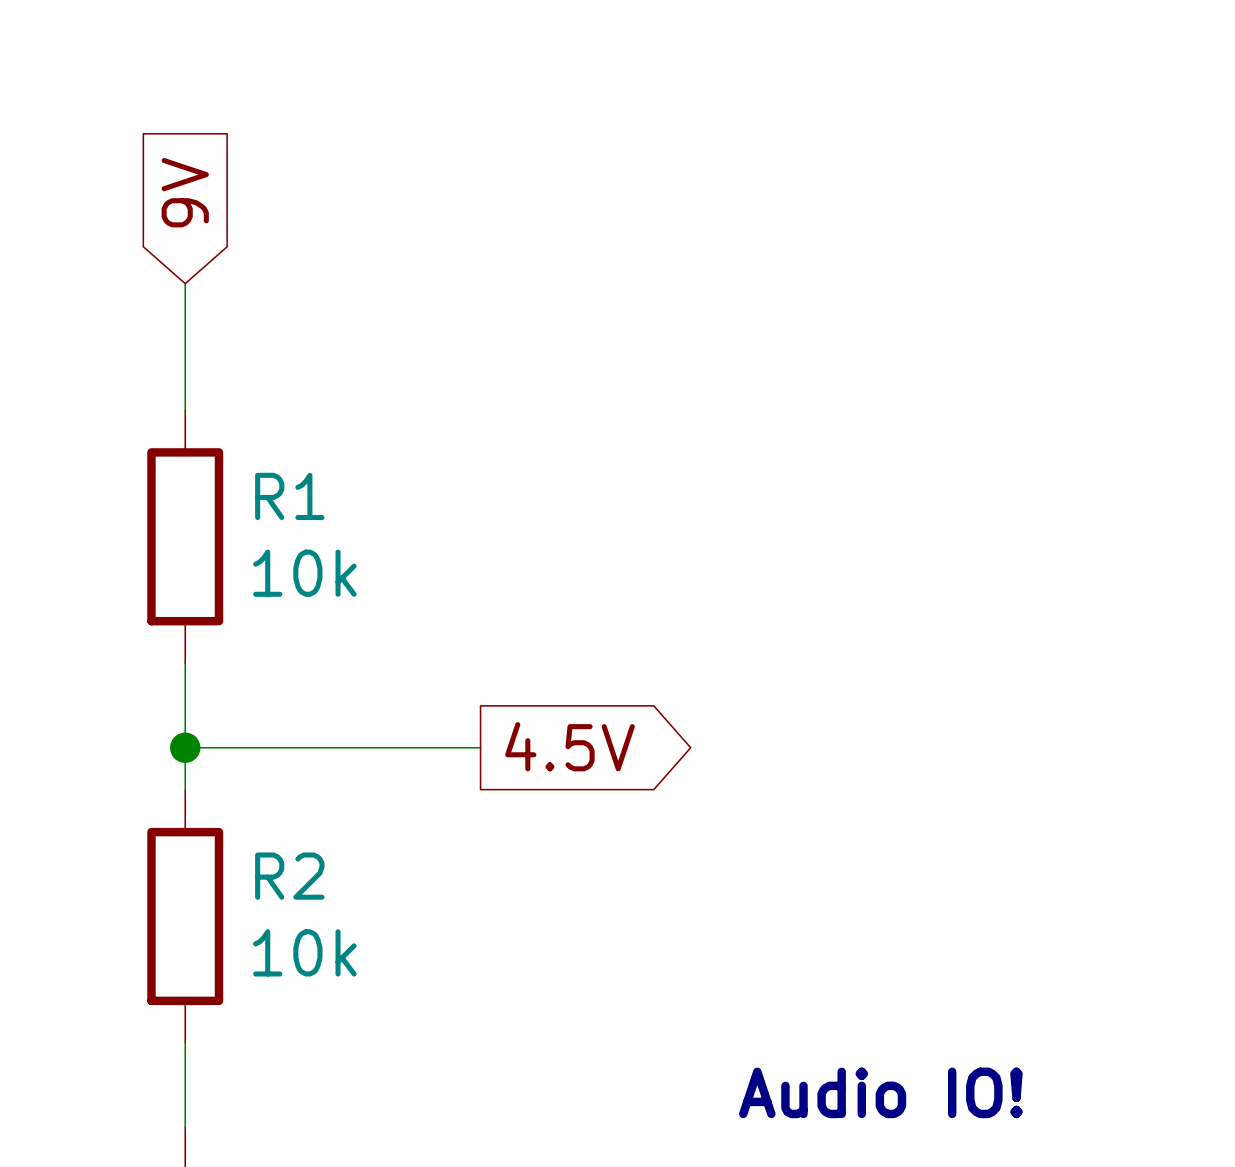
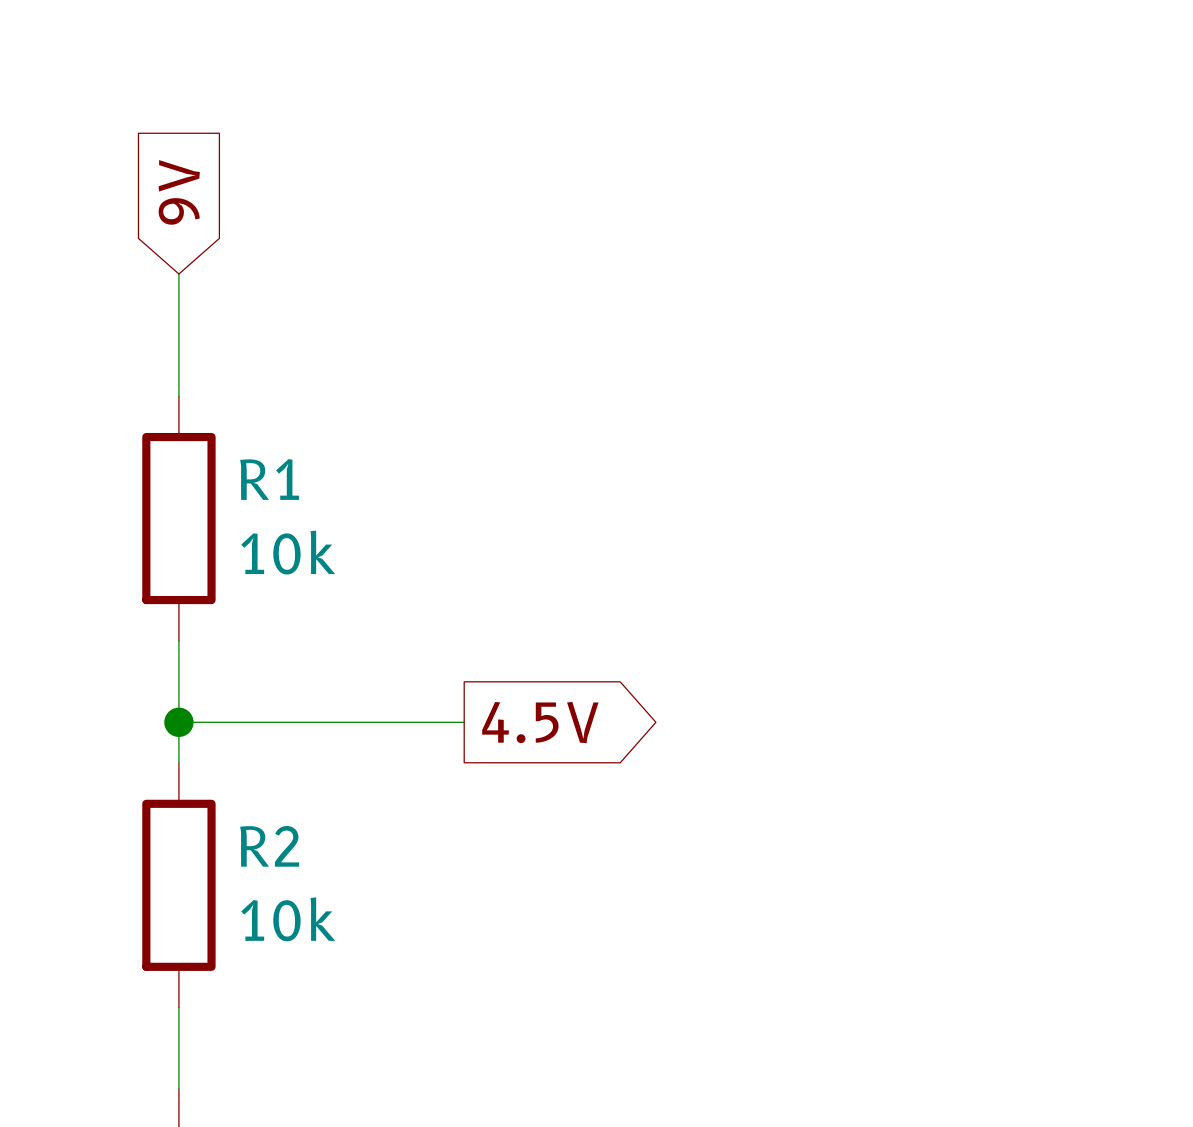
text: Audio IO! (880, 1092) -> none

